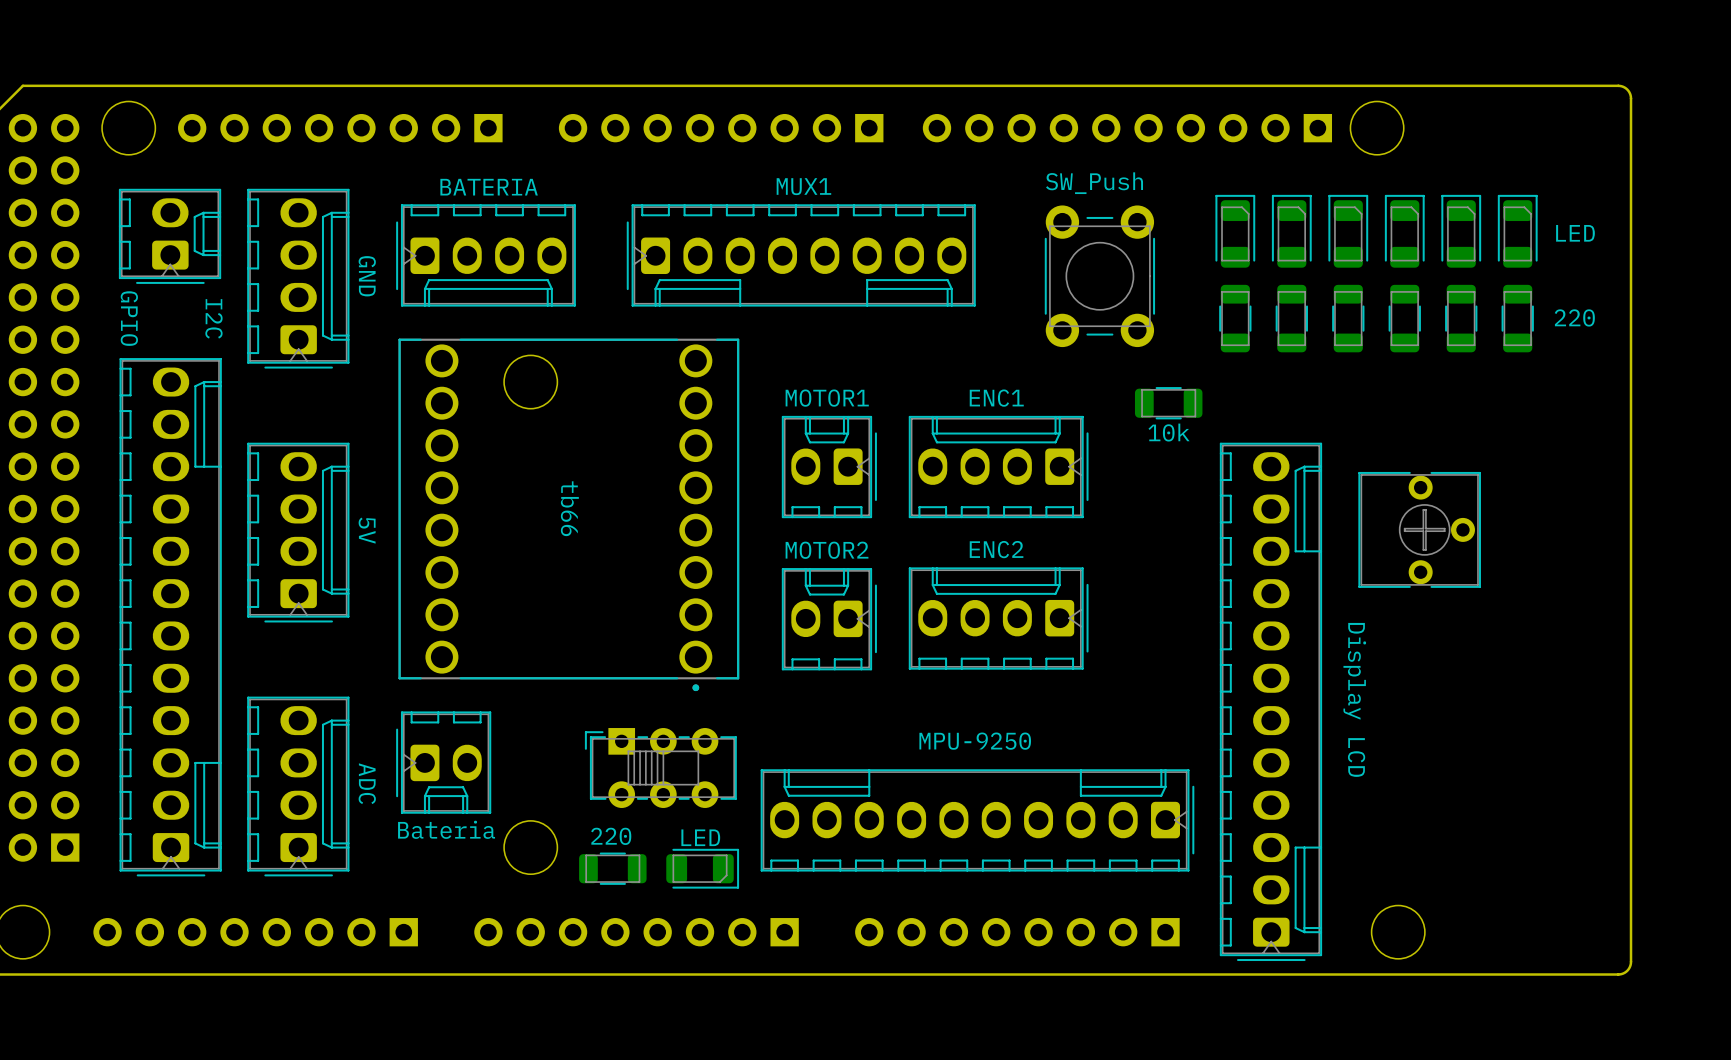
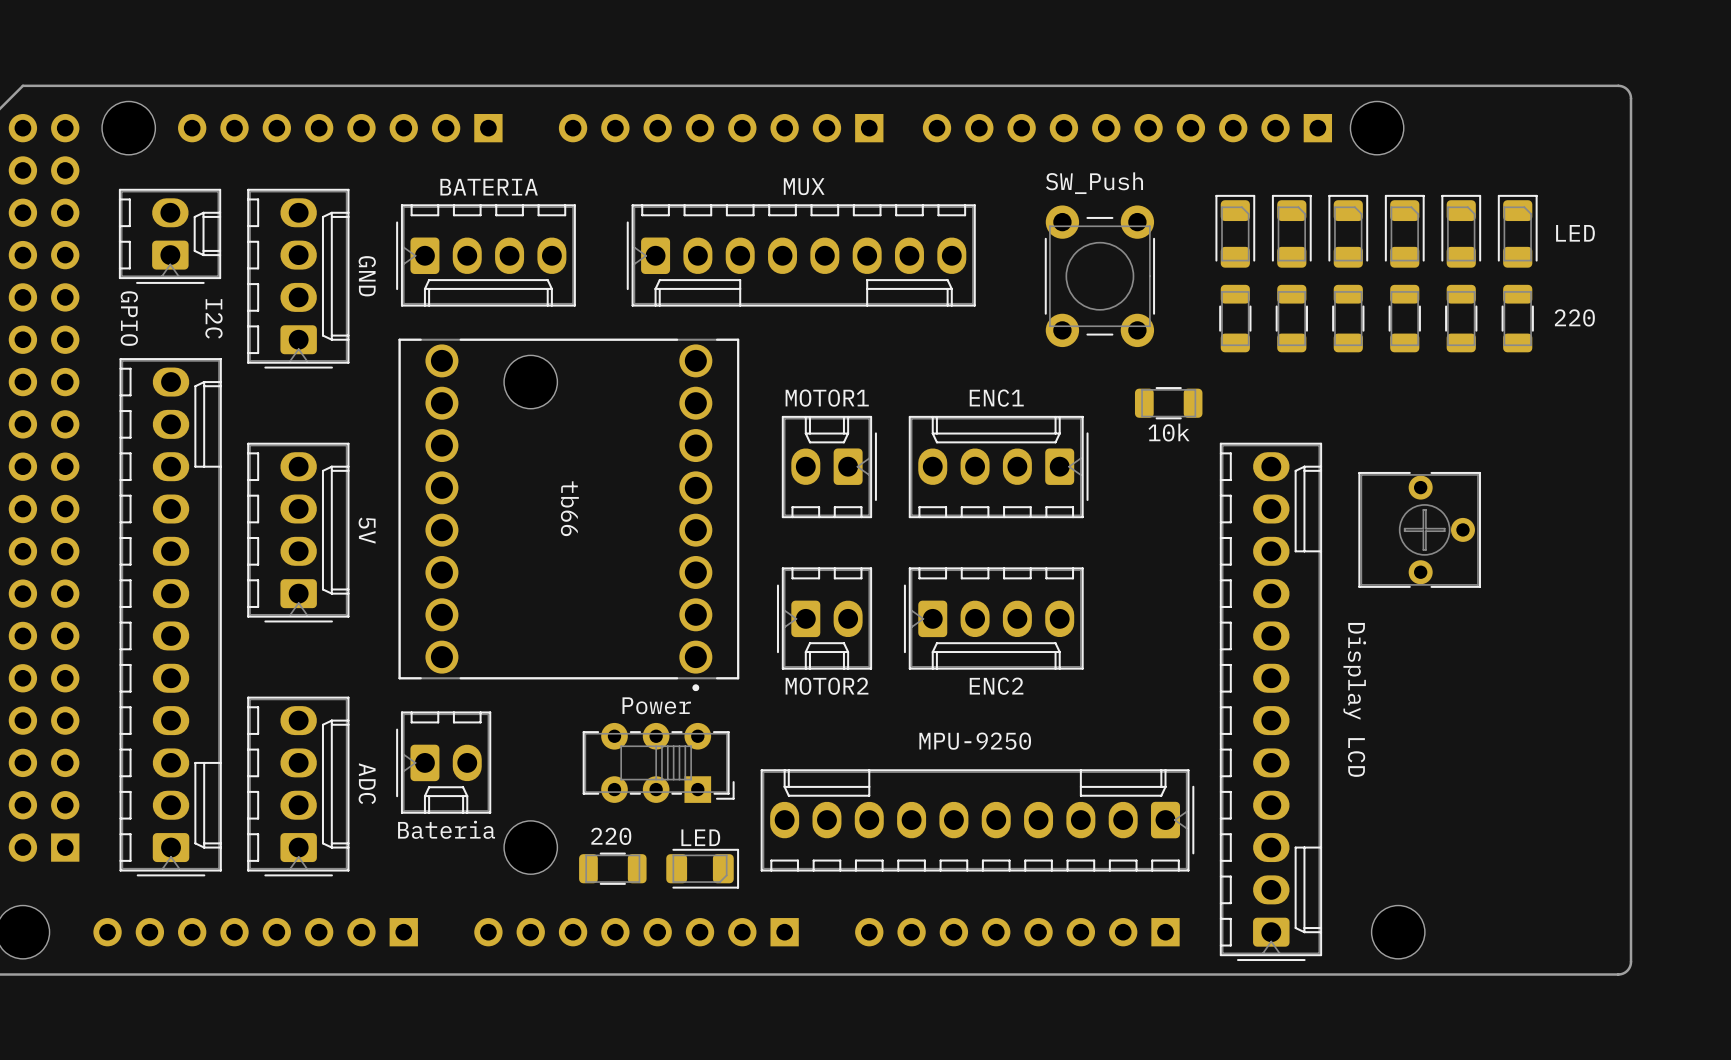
MUX1 name: MUX1 (803, 186) -> MUX (804, 186)
part rotation: 0° (998, 618) -> 180° (993, 618)
part rotation: 0° (829, 619) -> 180° (824, 618)
part value: none -> Power (656, 705)
part rotation: 0° (660, 768) -> 180° (658, 762)

